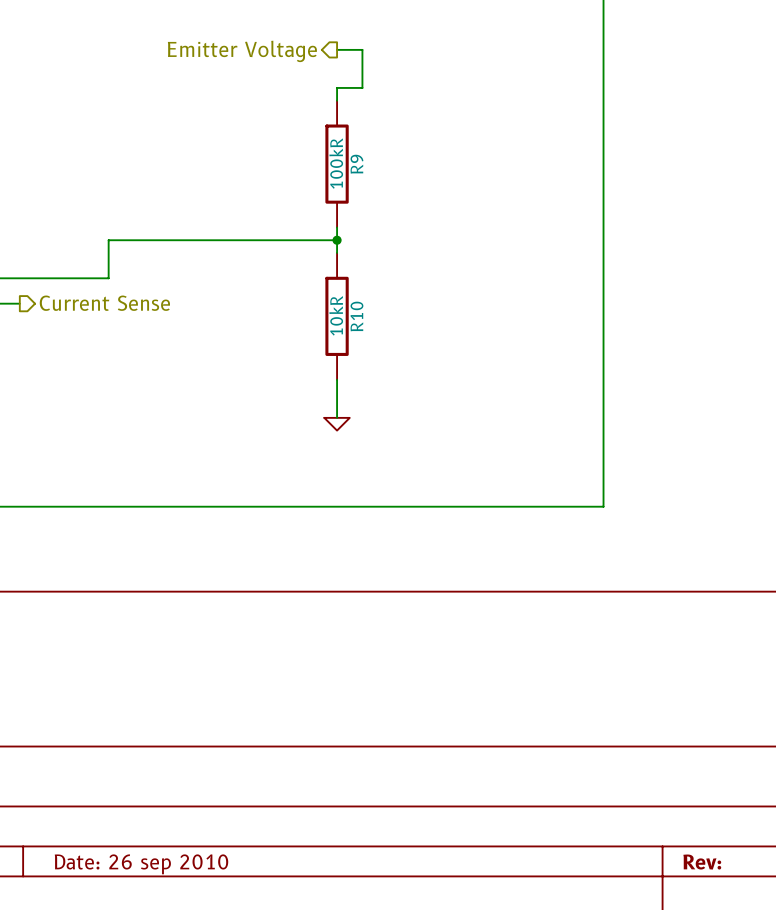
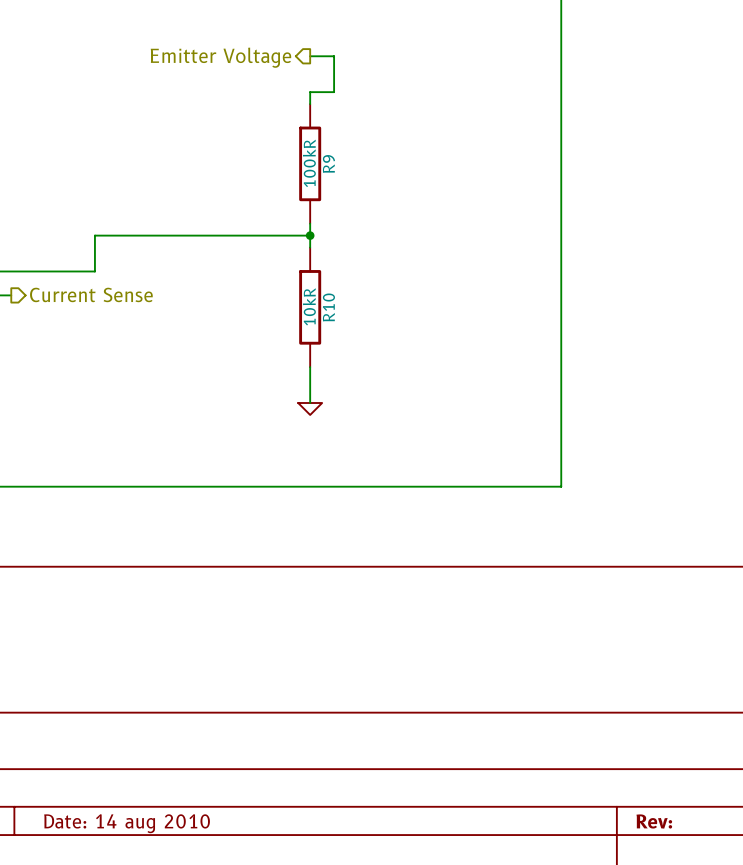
title block: Date: 26 sep 2010 (141, 864) -> Date: 14 aug 2010 (127, 823)

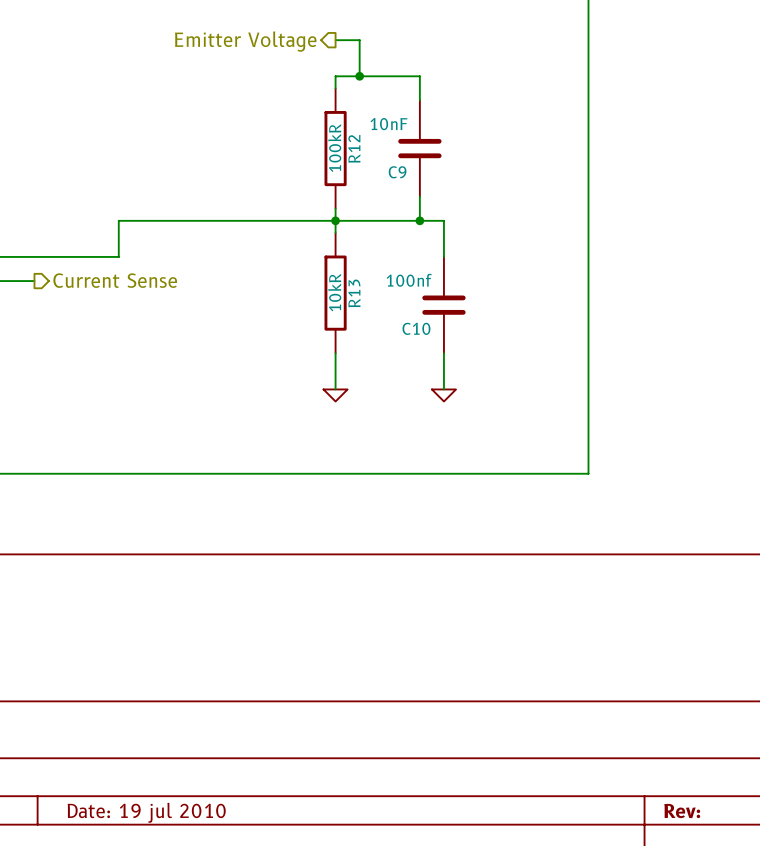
wire: none -> (359, 76) (419, 76) (419, 100)
junction: none -> (359, 76)
R9 name: R9 (328, 163) -> R12 (354, 148)
C9: none -> 10nF (419, 148)
wire: none -> (419, 196) (419, 220)
wire: none -> (335, 220) (443, 220) (443, 256)
junction: none -> (419, 220)
R10 name: R10 (328, 307) -> R13 (354, 293)
C10: none -> 100nf (443, 305)
wire: none -> (443, 353) (443, 389)
power symbol: none -> (443, 395)
title block: Date: 14 aug 2010 (127, 823) -> Date: 19 jul 2010 (146, 812)

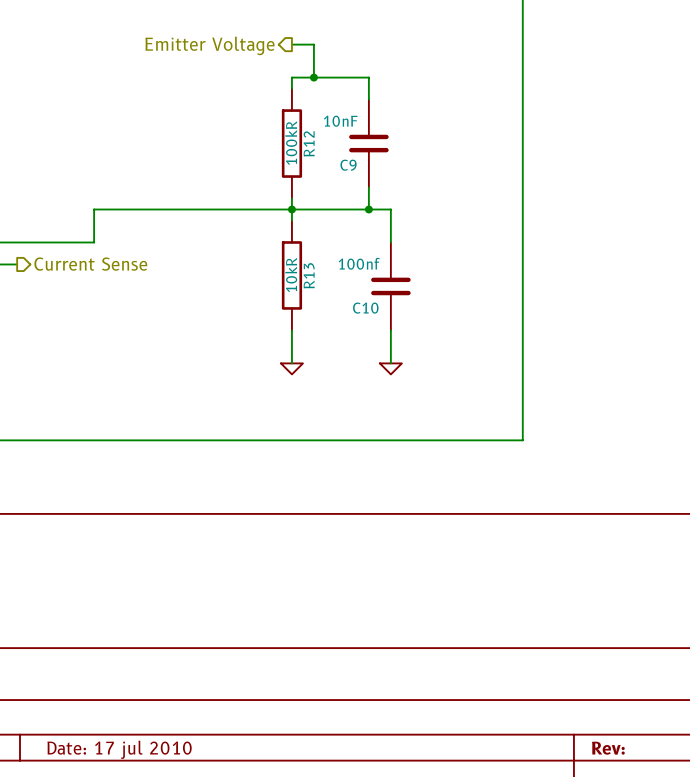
title block: Date: 19 jul 2010 (146, 812) -> Date: 17 jul 2010 (119, 749)

